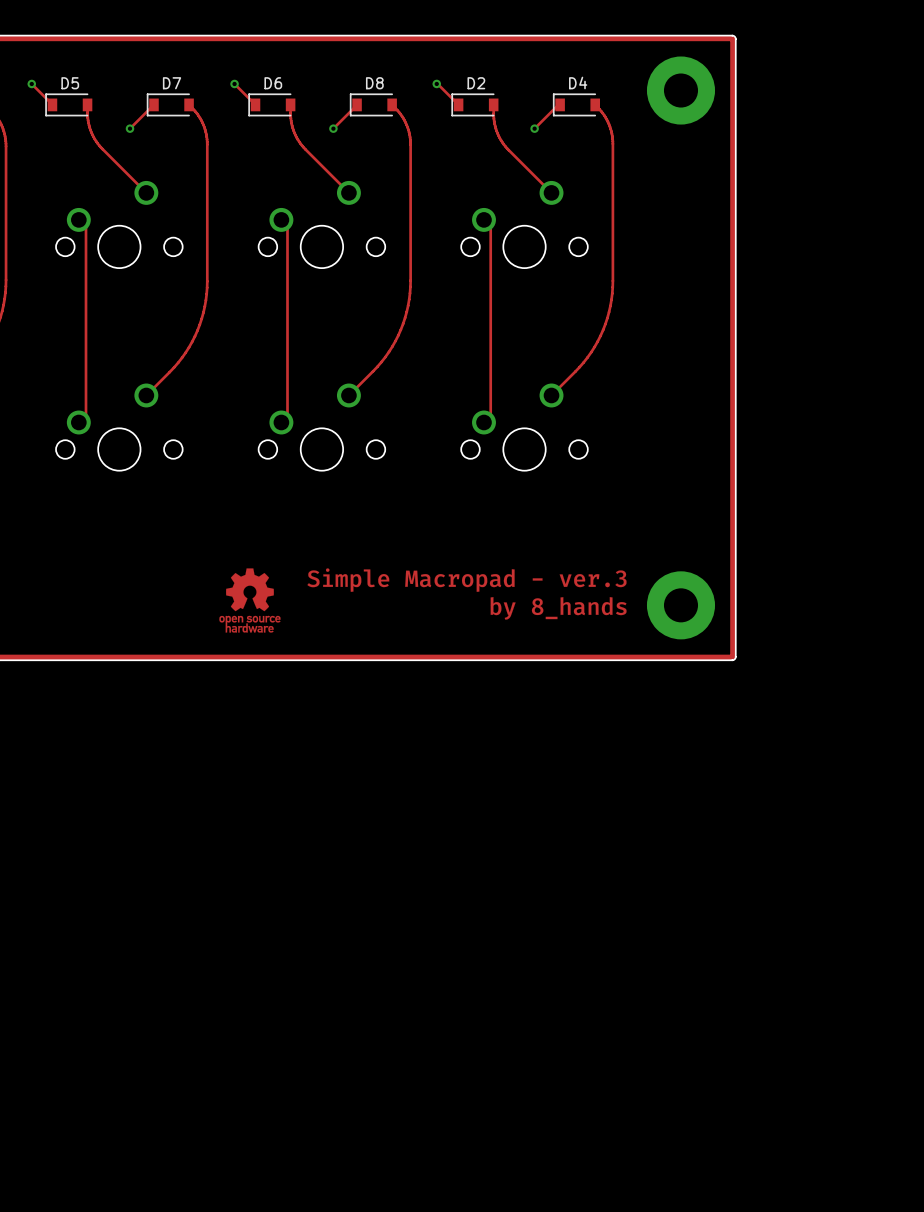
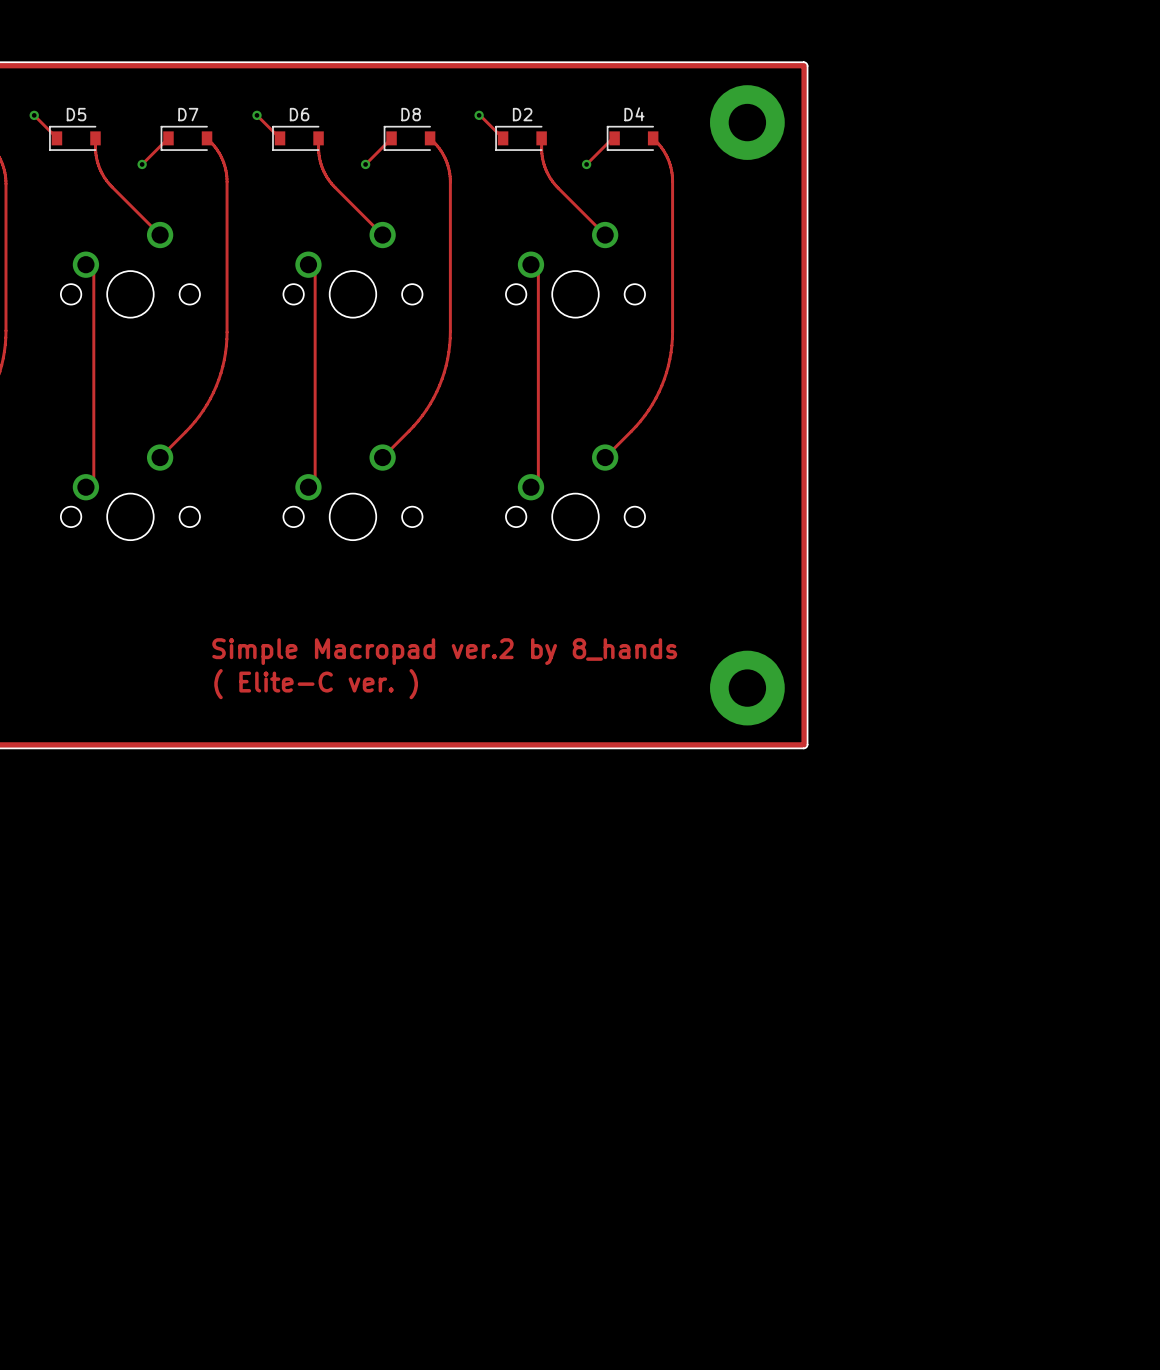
drawing: [219, 568, 281, 633] -> none
drawing: [307, 568, 627, 620] -> none
text: none -> Simple Macropad ver.2 by 8_hands (444, 651)
text: none -> ( Elite-C ver. ) (316, 684)

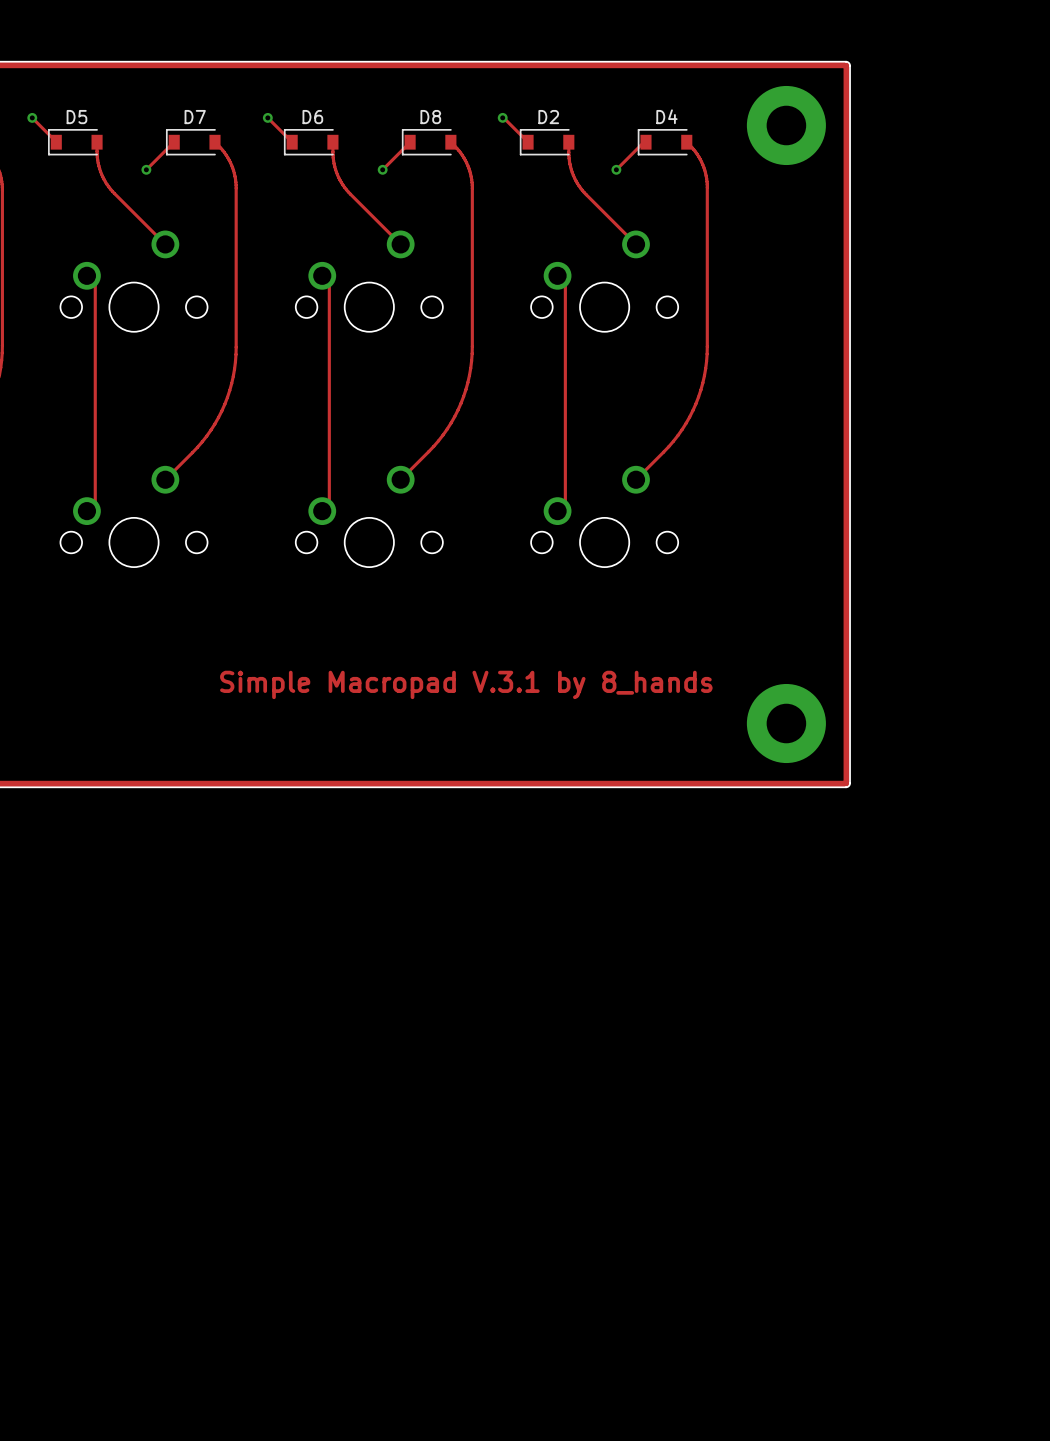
text: Simple Macropad ver.2 by 8_hands (444, 651) -> Simple Macropad V.3.1 by 8_hands (466, 684)
text: ( Elite-C ver. ) (316, 684) -> none

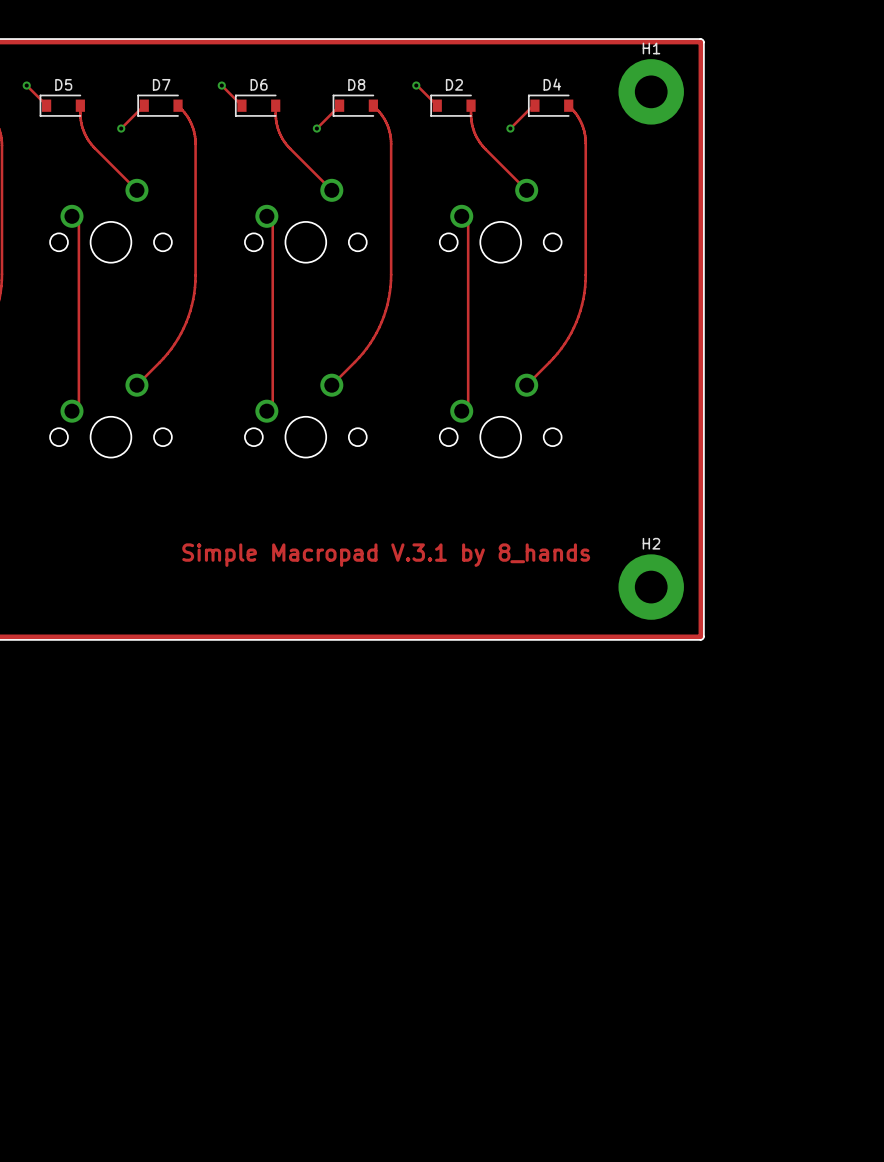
H1 name: none -> H1 (651, 48)
H2 name: none -> H2 (651, 543)

